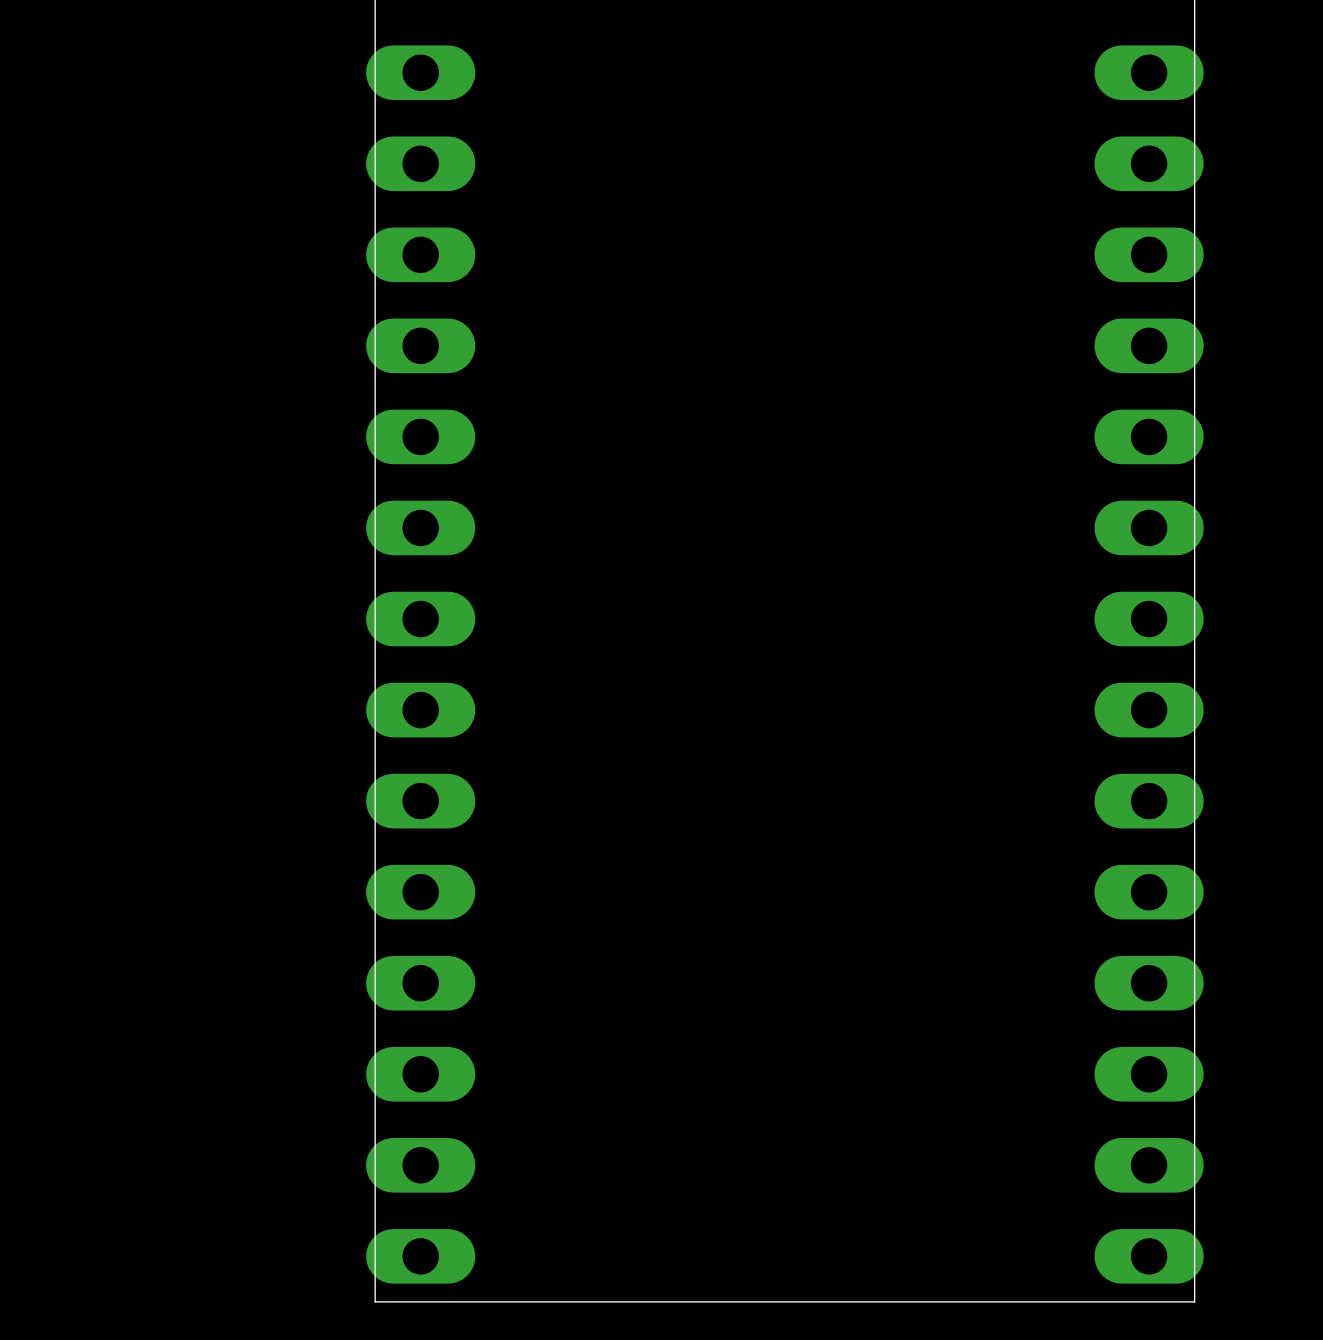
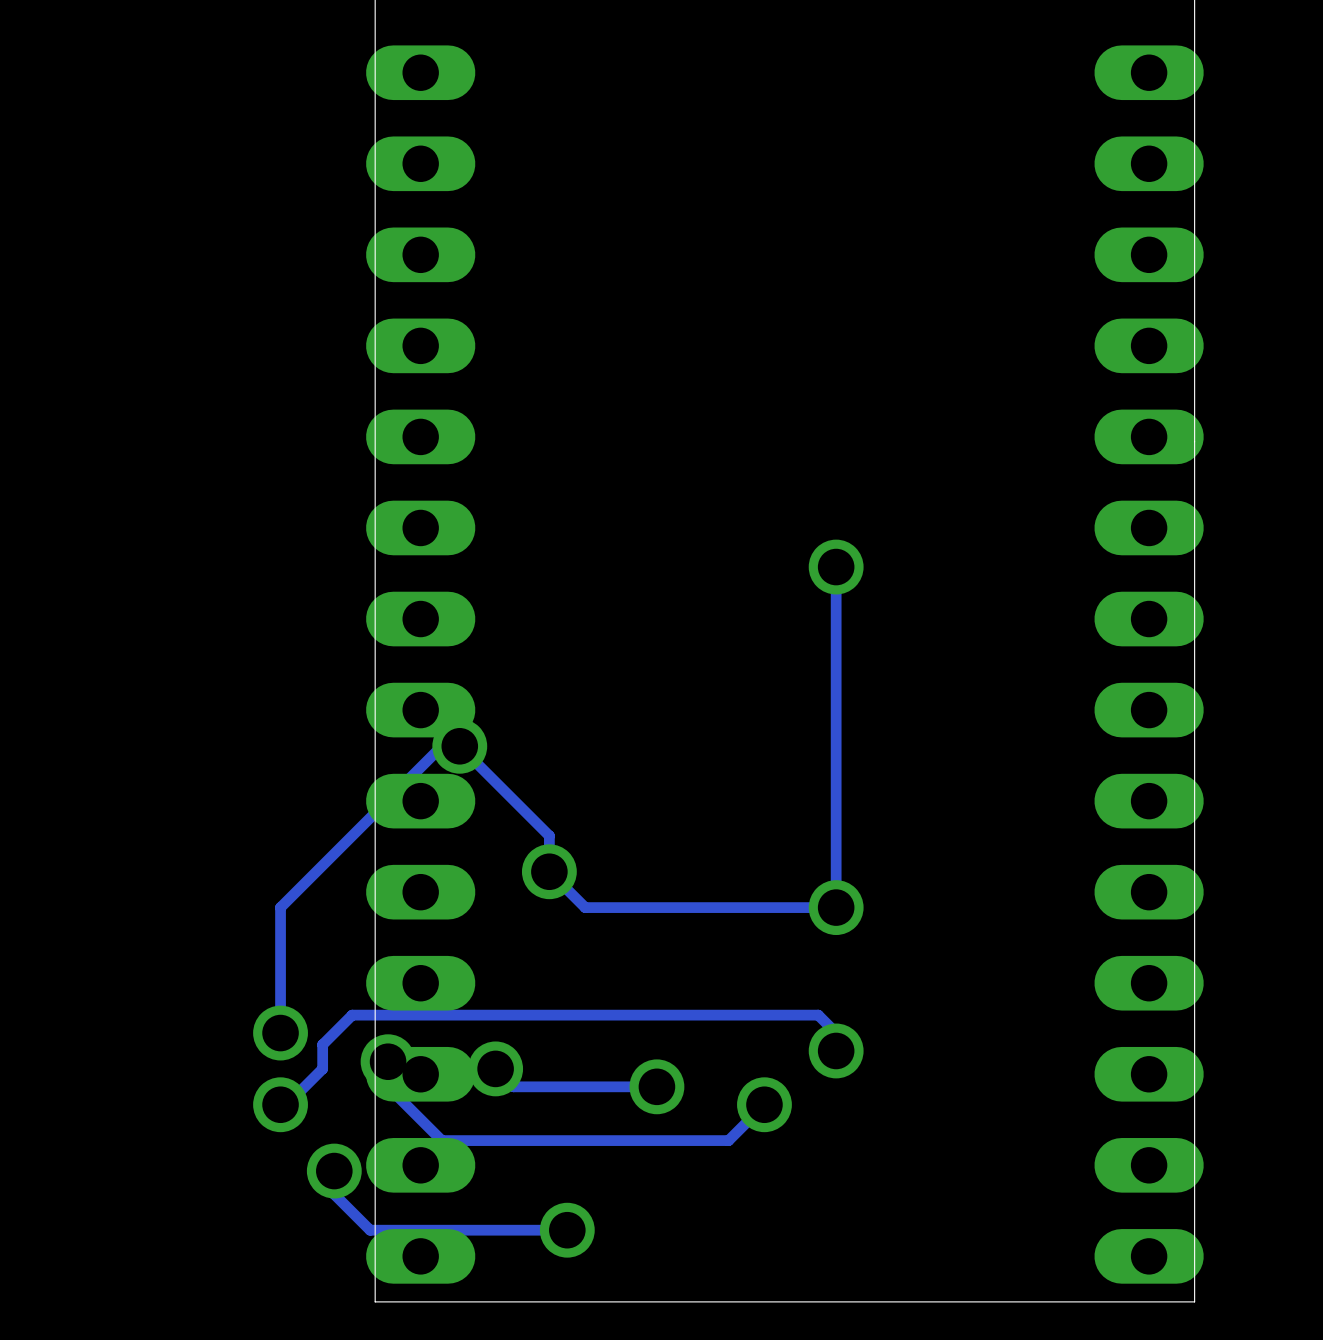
track: none -> (836, 567) (836, 907) (585, 907) (549, 871) (549, 835) (459, 746) (441, 746) (280, 907) (280, 1033)
via: none -> (836, 567)
via: none -> (459, 746)
via: none -> (549, 871)
via: none -> (836, 907)
via: none -> (280, 1033)
track: none -> (836, 1050) (836, 1033) (818, 1015) (352, 1015) (322, 1044) (322, 1068) (286, 1104) (280, 1104)
via: none -> (836, 1050)
track: none -> (388, 1061) (388, 1086) (441, 1140) (728, 1140) (764, 1104)
via: none -> (388, 1061)
track: none -> (495, 1068) (513, 1086) (656, 1086)
via: none -> (495, 1068)
via: none -> (656, 1086)
via: none -> (280, 1104)
via: none -> (764, 1104)
track: none -> (334, 1171) (334, 1194) (370, 1230) (567, 1230)
via: none -> (334, 1171)
via: none -> (567, 1230)

